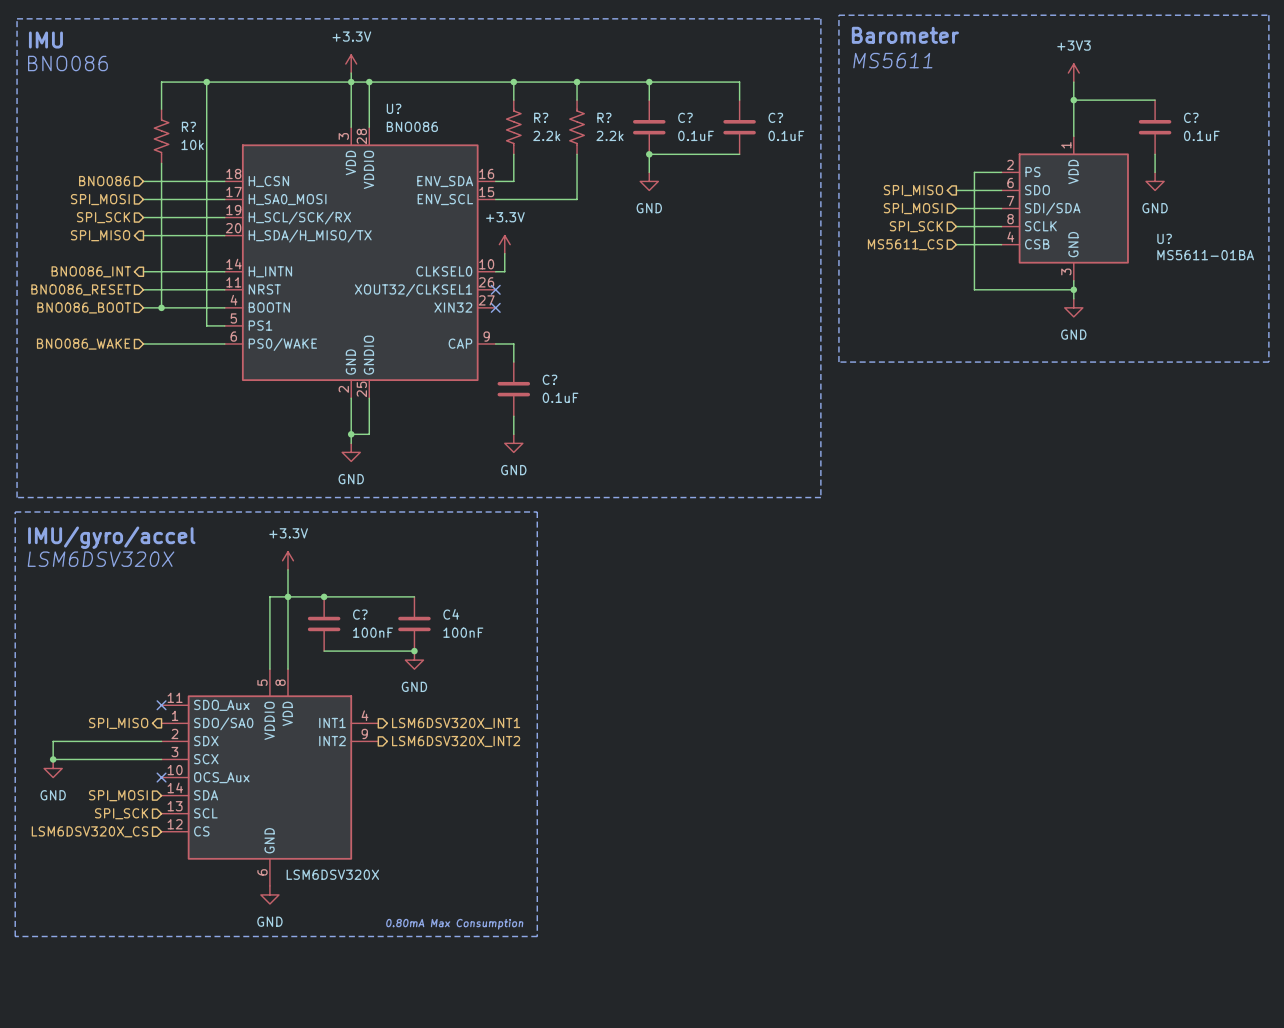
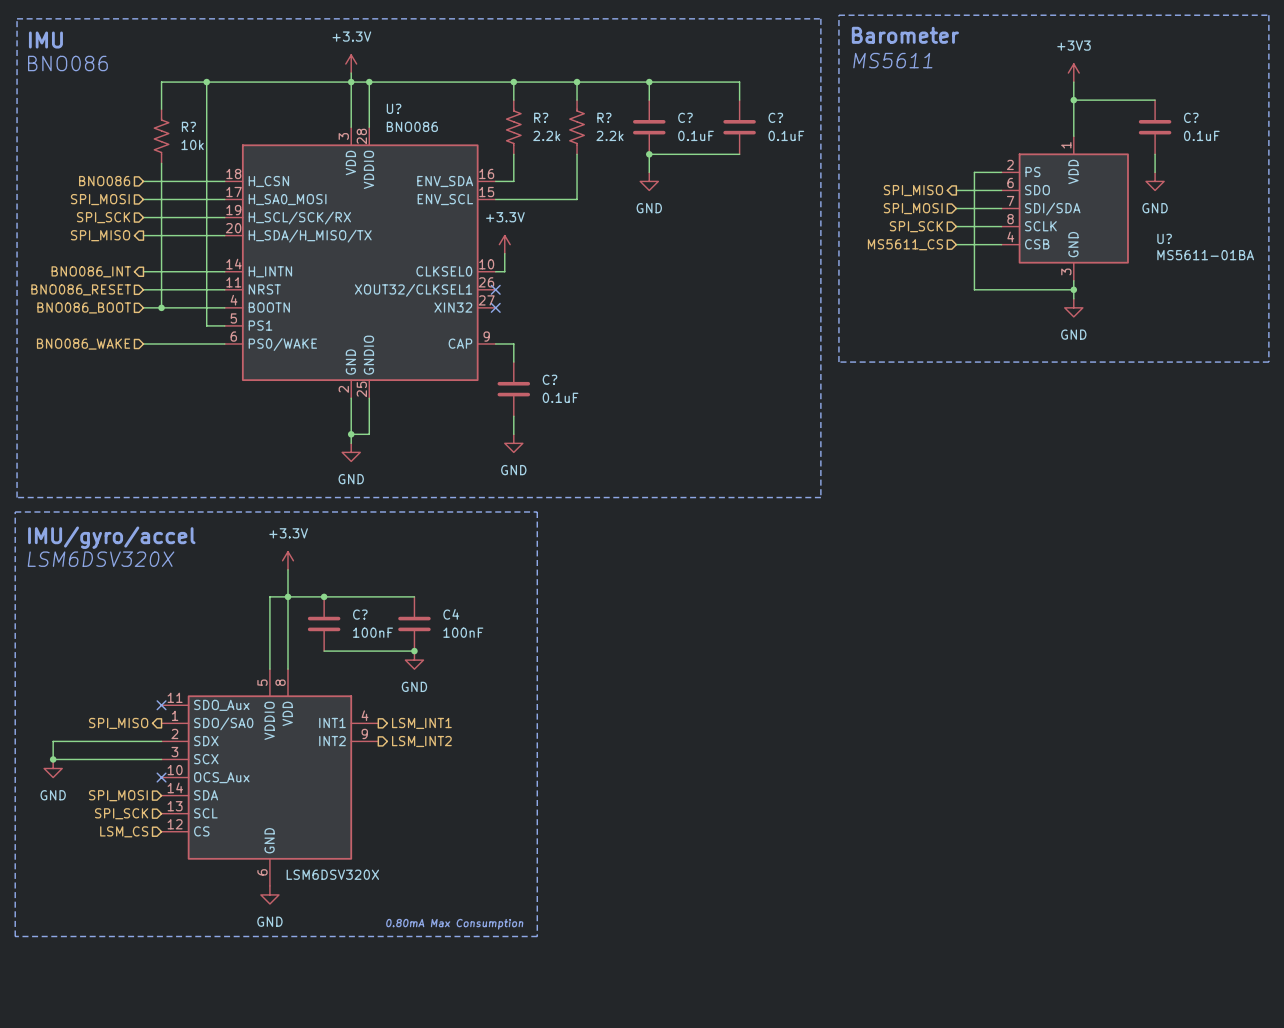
hierarchical label: LSM6DSV320X_INT1 (456, 723) -> LSM_INT1 (421, 723)
hierarchical label: LSM6DSV320X_INT2 (456, 741) -> LSM_INT2 (421, 741)
hierarchical label: LSM6DSV320X_CS (90, 831) -> LSM_CS (124, 831)

